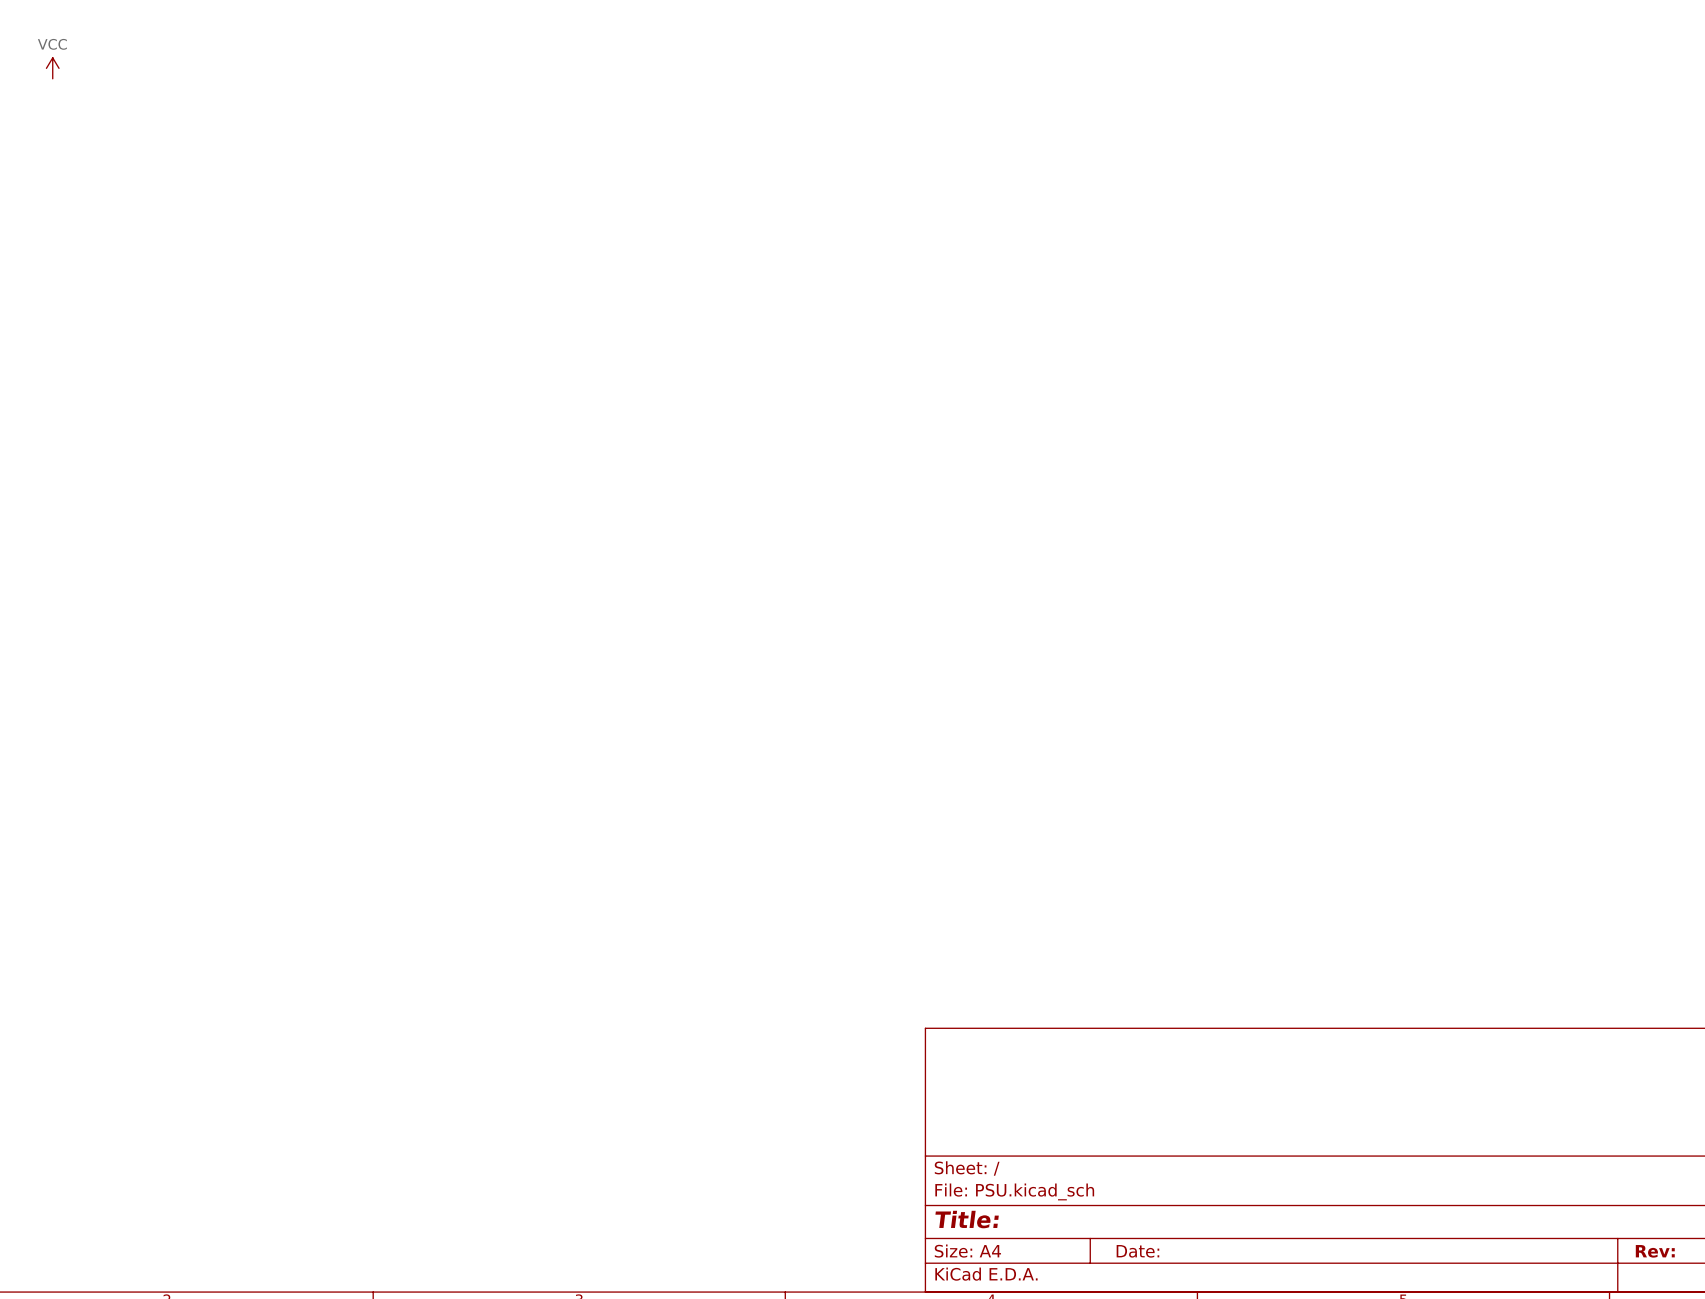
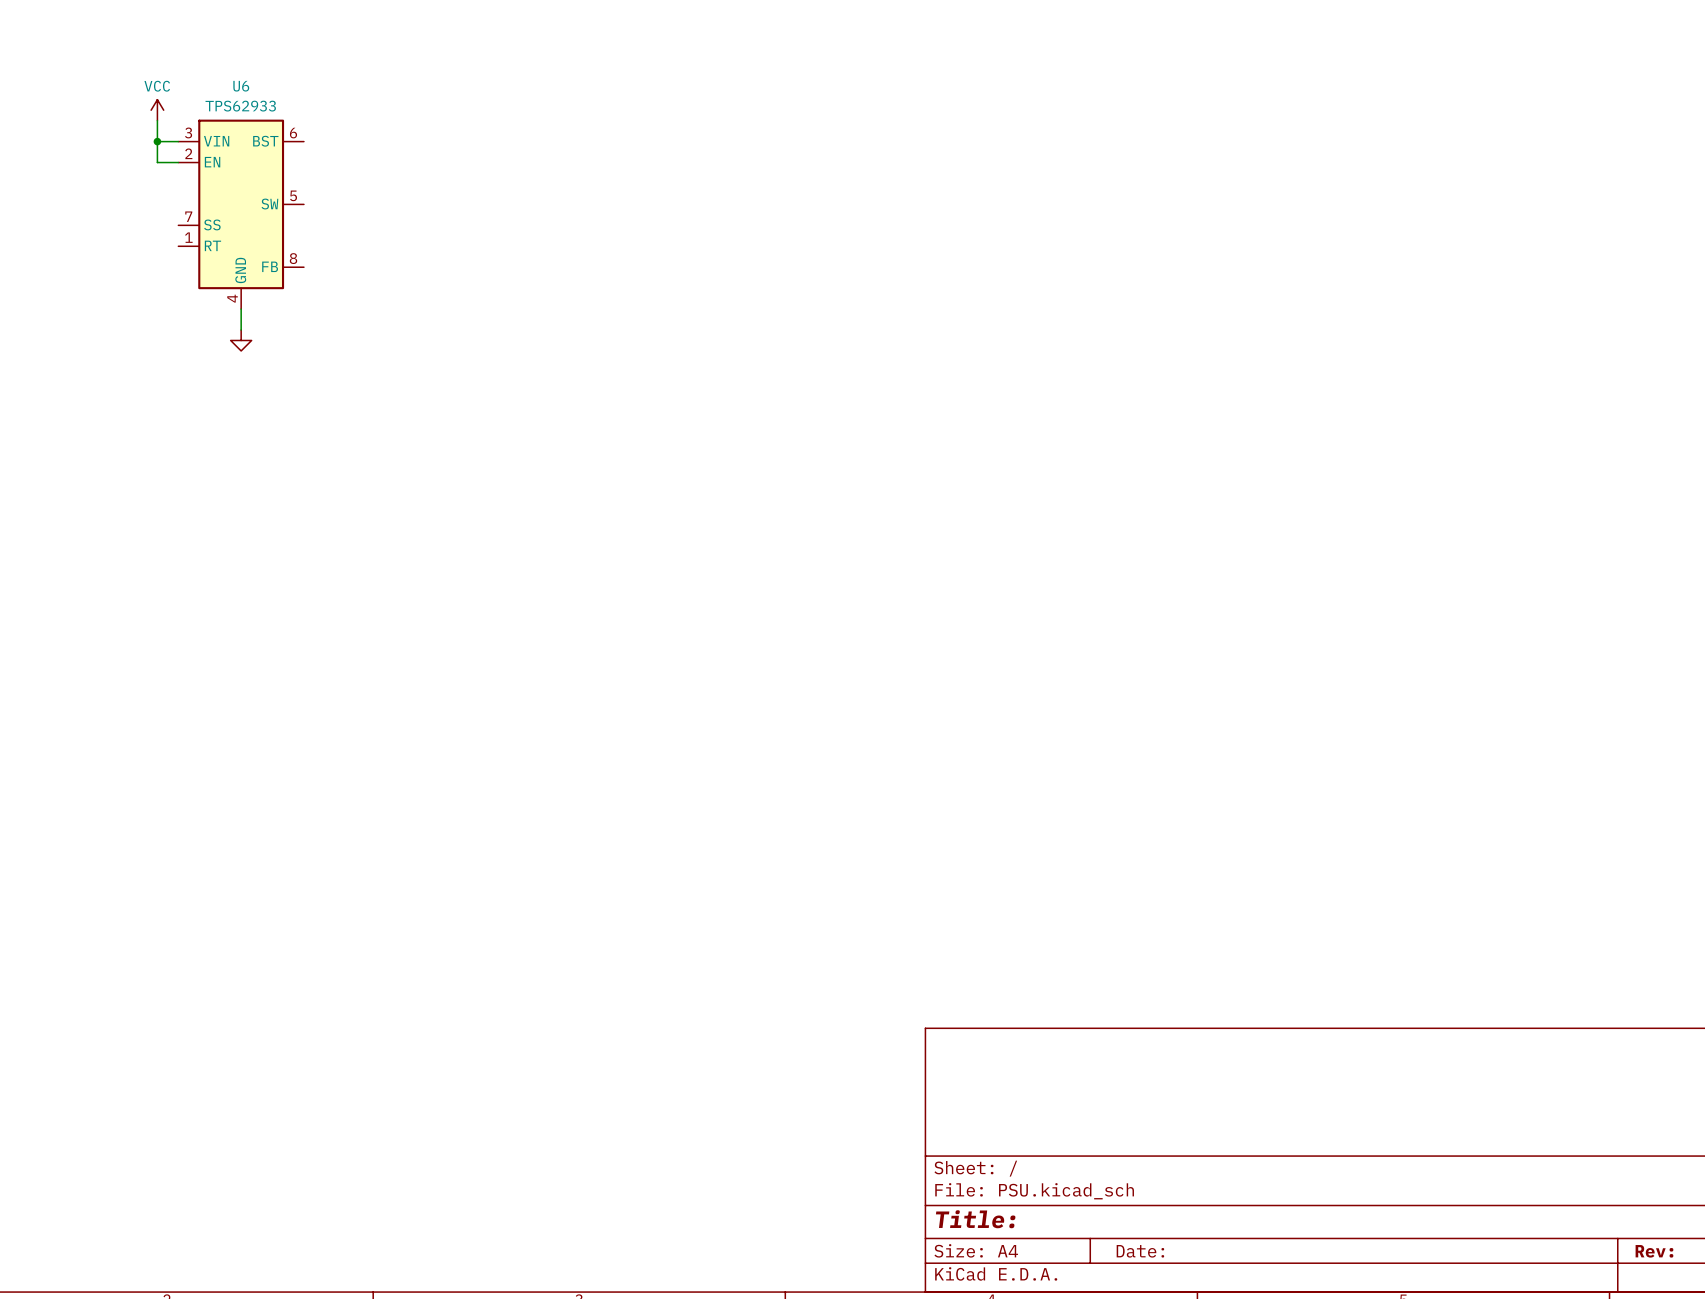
power symbol position: VCC (52, 68) -> VCC (157, 110)
wire: none -> (157, 120) (157, 162) (178, 162)
wire: none -> (157, 141) (178, 141)
junction: none -> (157, 141)
U6: none -> TPS62933 (241, 214)
wire: none -> (241, 309) (241, 330)
power symbol: none -> (241, 340)

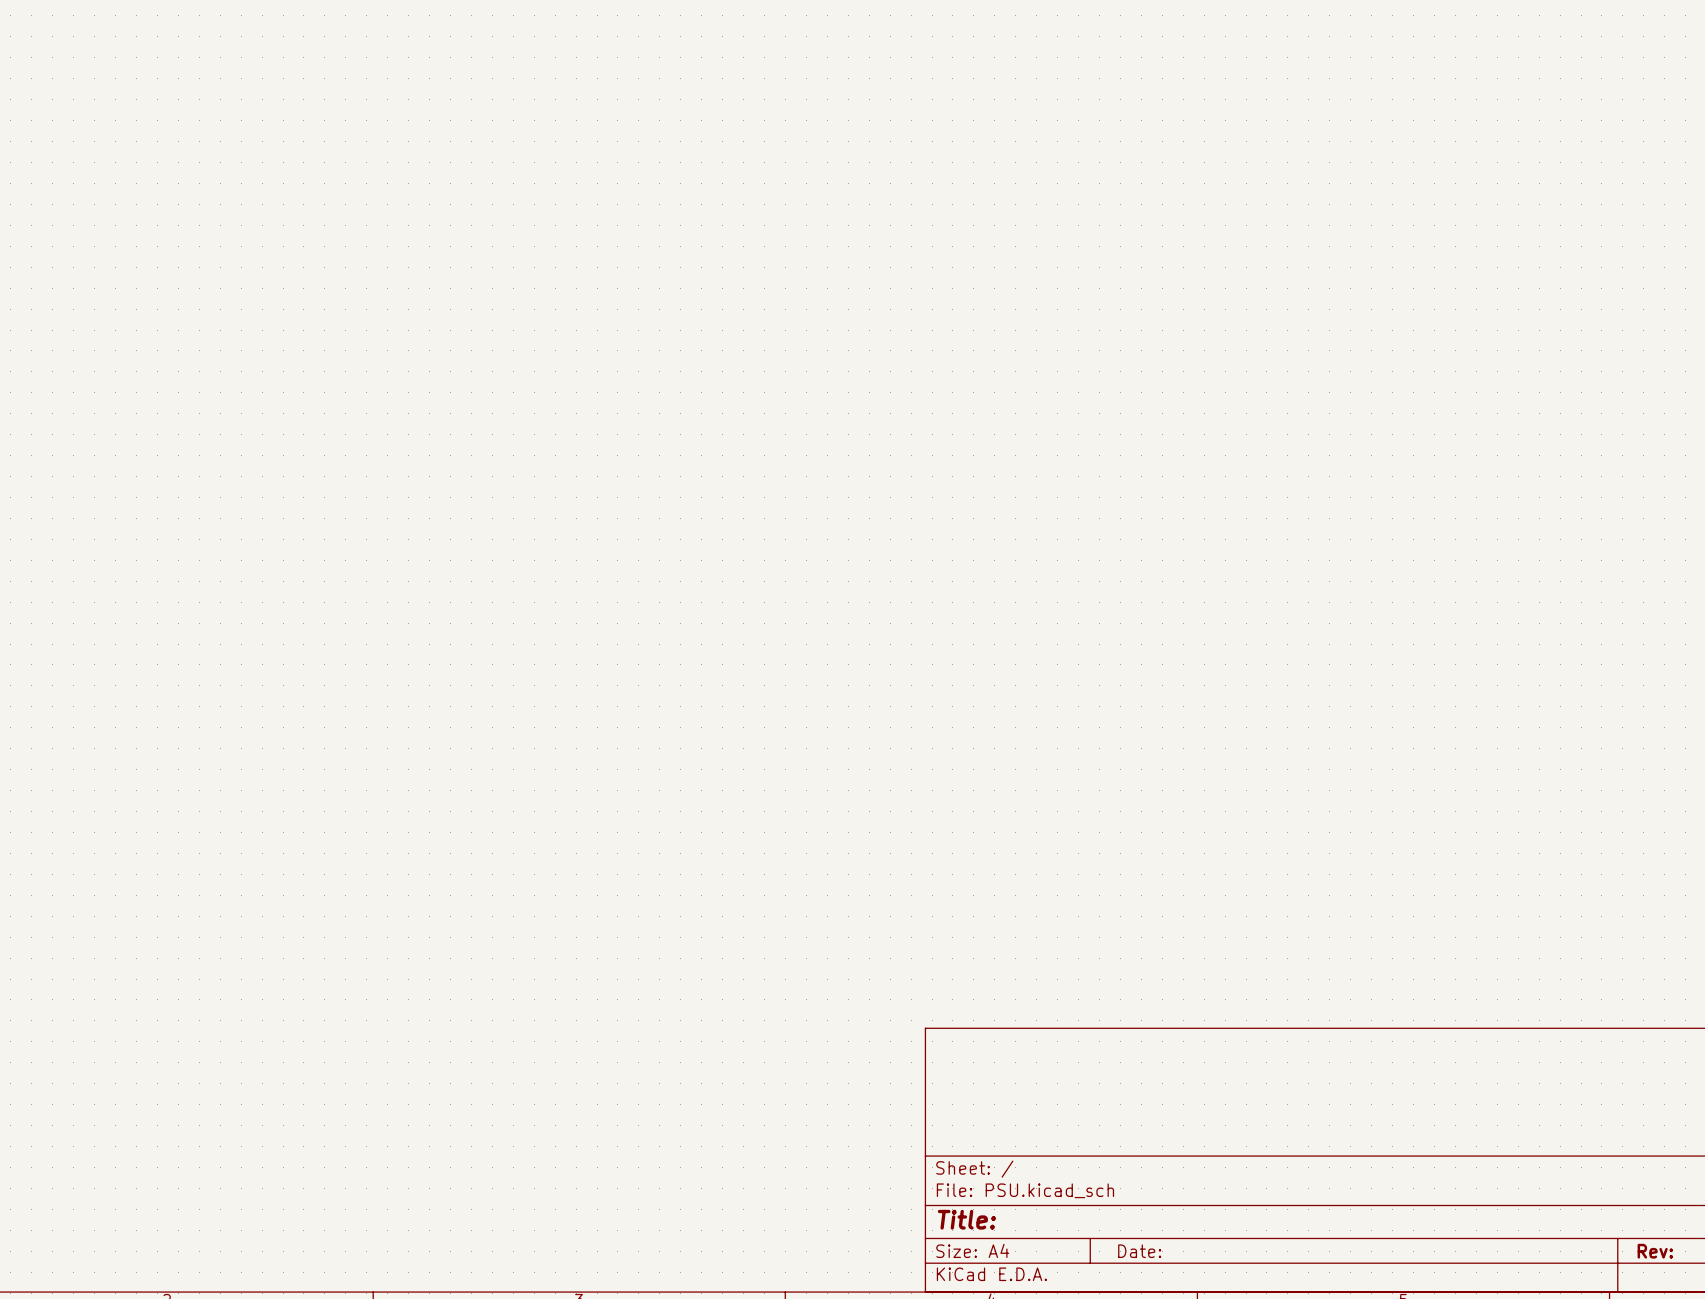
power symbol: VCC (157, 110) -> none
wire: (157, 120) (157, 162) (178, 162) -> none
wire: (157, 141) (178, 141) -> none
junction: (157, 141) -> none
U6: TPS62933 (241, 214) -> none
wire: (241, 309) (241, 330) -> none
power symbol: (241, 340) -> none

